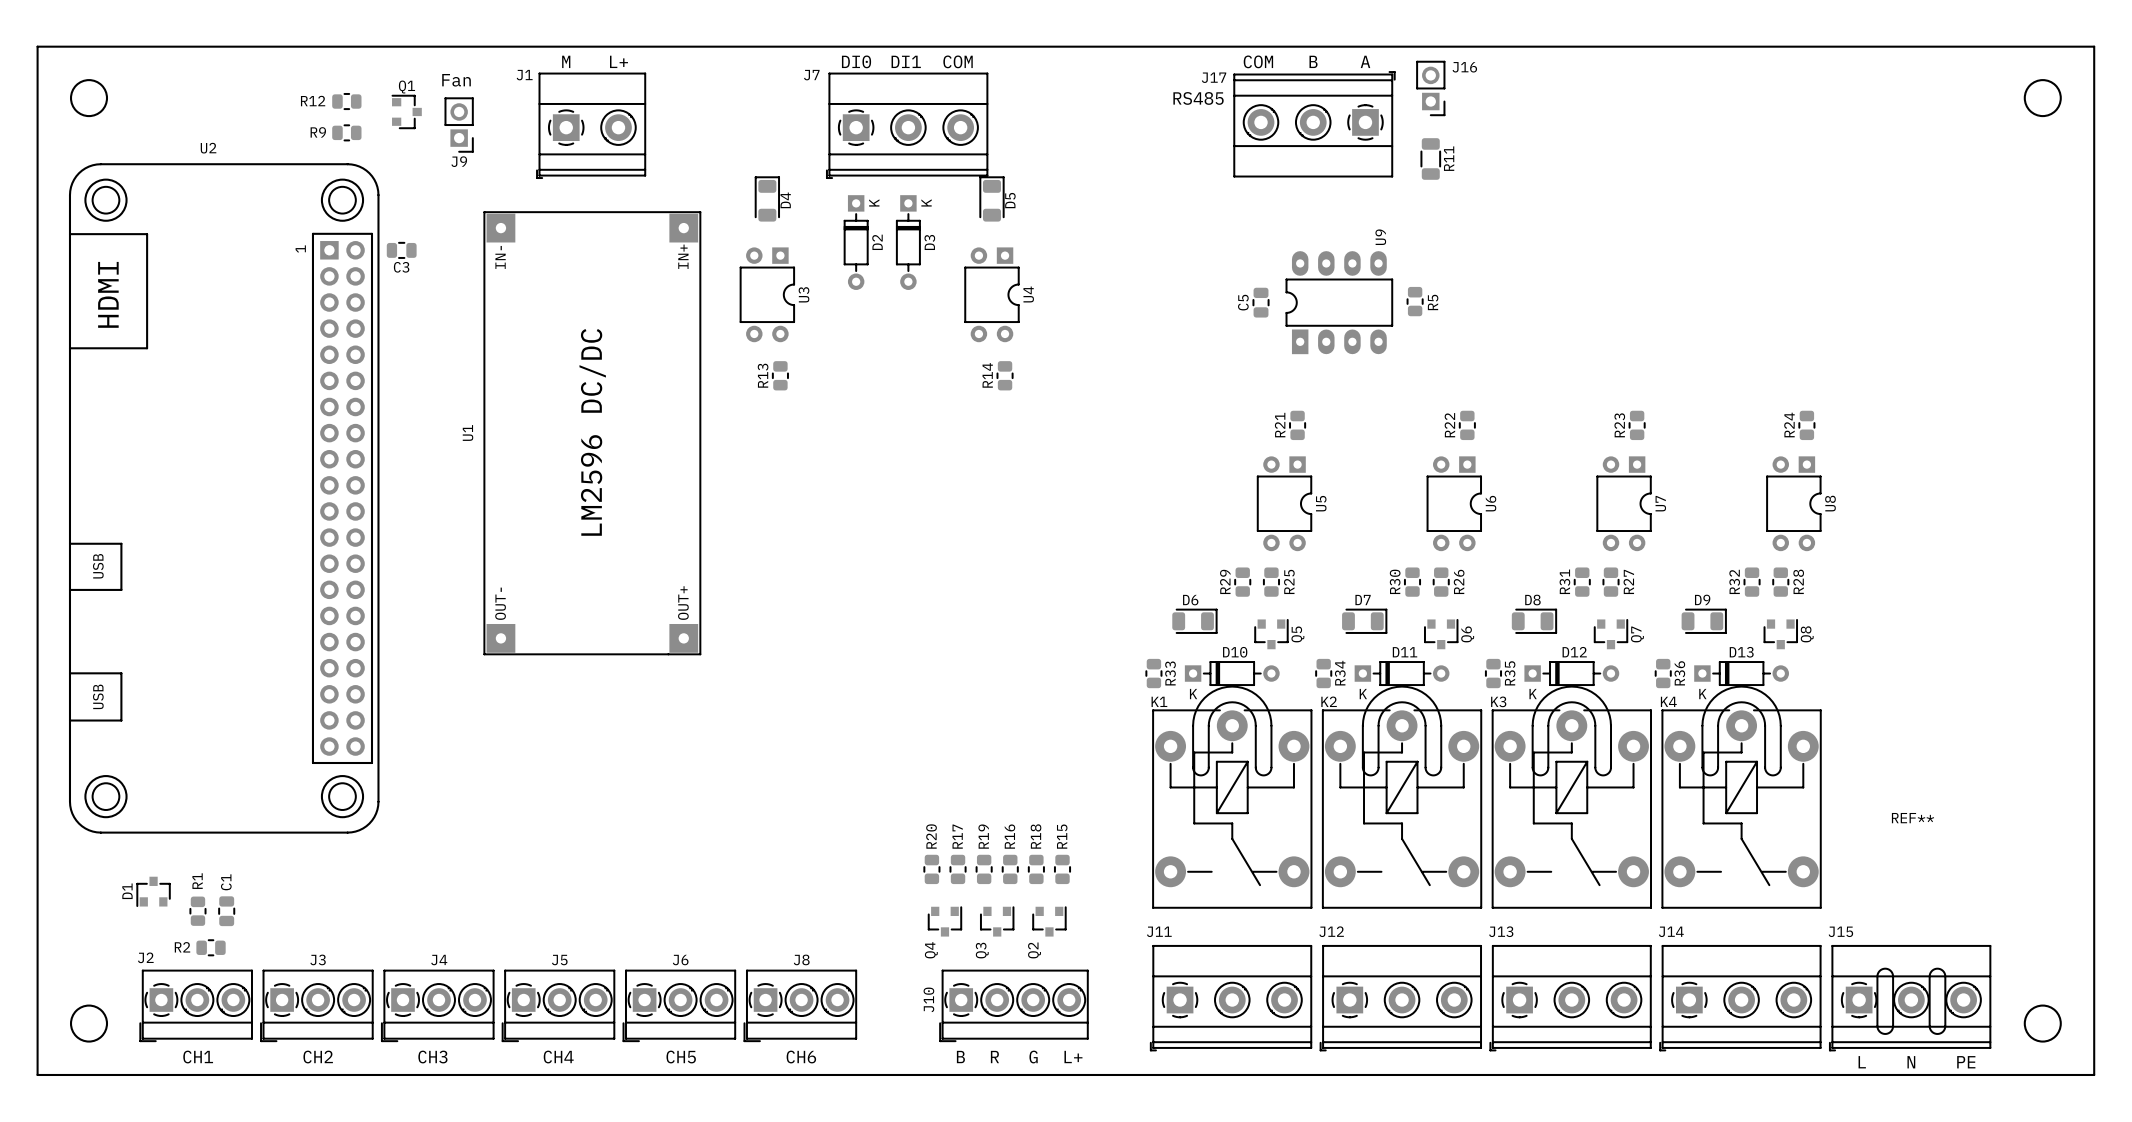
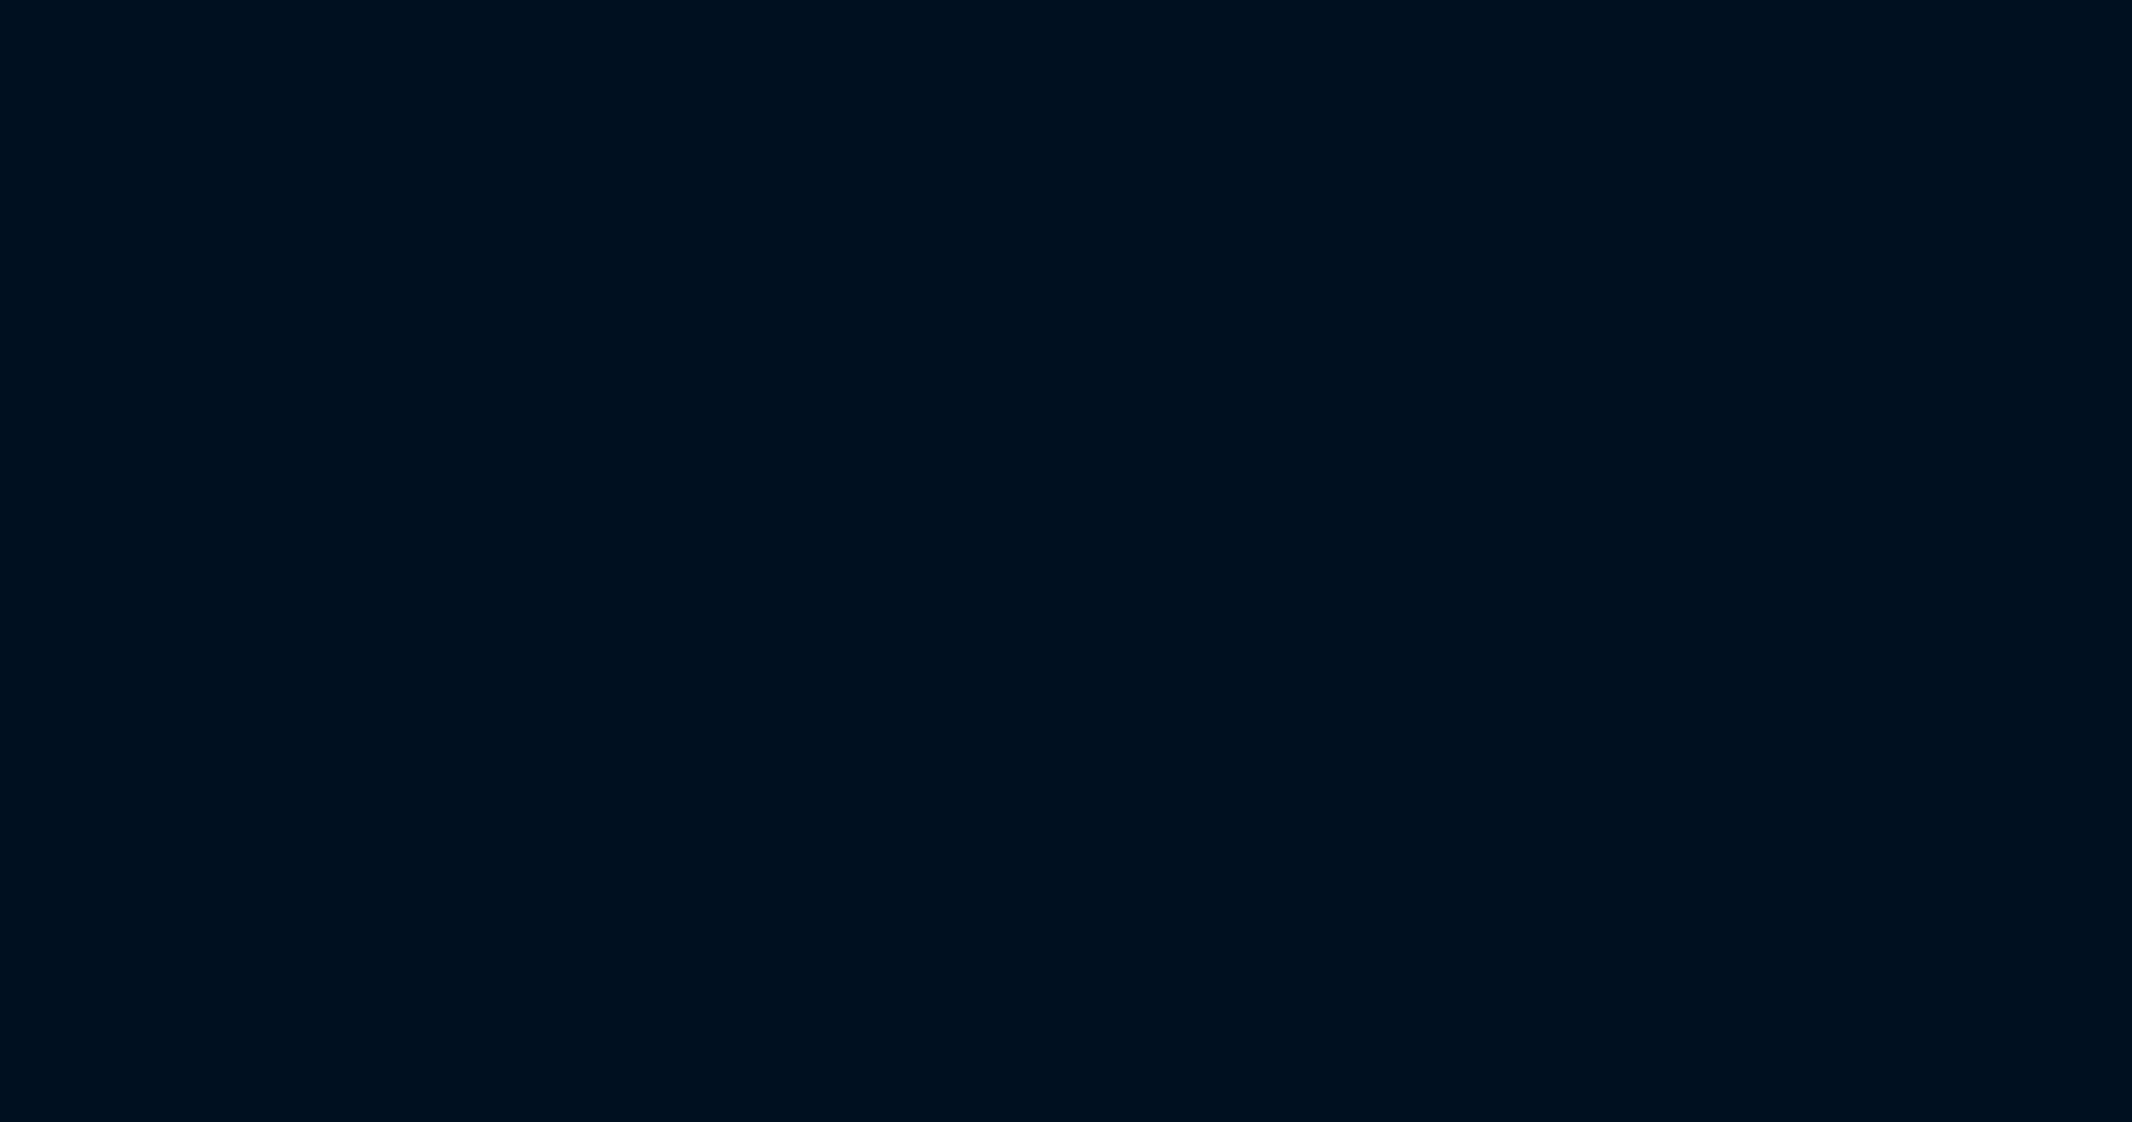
board edge: (37, 46) (37, 1074) (2094, 1074) (2094, 46) (37, 46) -> none
text: M (566, 61) -> none
text: L+ (618, 61) -> none
text: DI0 (856, 61) -> none
text: DI1 (906, 61) -> none
text: COM (958, 61) -> none
text: COM (1258, 61) -> none
text: B (1313, 61) -> none
text: A (1365, 61) -> none
round board edge: [69, 79, 109, 118] -> none
round board edge: [2023, 79, 2062, 118] -> none
text: Fan (456, 80) -> none
J16: (1430, 88) -> none
text: RS485 (1198, 98) -> none
R12: (346, 101) -> none
Q1: (406, 111) -> none
J17: (1314, 124) -> none
J9: (459, 125) -> none
J1: (591, 125) -> none
J7: (907, 125) -> none
R9: (346, 132) -> none
R11: (1430, 158) -> none
round board edge: [91, 186, 120, 215] -> none
round board edge: [328, 186, 357, 215] -> none
D4: (767, 199) -> none
D5: (991, 199) -> none
D2: (856, 242) -> none
D3: (908, 242) -> none
C3: (401, 250) -> none
U3: (767, 294) -> none
U4: (991, 294) -> none
R5: (1415, 301) -> none
C5: (1261, 302) -> none
U9: (1339, 302) -> none
R13: (780, 375) -> none
R14: (1005, 375) -> none
R21: (1297, 425) -> none
R22: (1467, 425) -> none
R23: (1637, 425) -> none
R24: (1806, 425) -> none
U1: (592, 433) -> none
U2: (224, 498) -> none
U5: (1284, 503) -> none
U6: (1454, 503) -> none
U7: (1624, 503) -> none
U8: (1793, 503) -> none
R29: (1242, 582) -> none
R25: (1271, 582) -> none
R30: (1412, 582) -> none
R26: (1441, 582) -> none
R31: (1582, 582) -> none
R27: (1611, 582) -> none
R32: (1752, 582) -> none
R28: (1780, 582) -> none
D6: (1194, 621) -> none
D7: (1364, 621) -> none
D8: (1534, 621) -> none
D9: (1704, 621) -> none
Q5: (1271, 634) -> none
Q6: (1441, 634) -> none
Q7: (1611, 634) -> none
Q8: (1780, 634) -> none
R33: (1153, 673) -> none
D10: (1232, 673) -> none
R34: (1323, 673) -> none
D11: (1402, 673) -> none
R35: (1493, 673) -> none
D12: (1571, 673) -> none
R36: (1663, 673) -> none
D13: (1741, 673) -> none
board edge: (1193, 725) (1193, 768) (1196, 773) (1201, 775) (1206, 773) (1208, 768) (1208, 725) (1211, 714) (1217, 707) (1226, 703) (1235, 702) (1244, 705) (1252, 714) (1255, 722) (1256, 770) (1263, 775) (1270, 771) (1270, 715) (1263, 701) (1251, 691) (1232, 686) (1212, 691) (1198, 706) (1193, 725) -> none
board edge: (1362, 725) (1362, 768) (1365, 773) (1371, 775) (1376, 773) (1378, 768) (1378, 725) (1381, 714) (1387, 707) (1395, 703) (1405, 702) (1413, 705) (1422, 714) (1425, 722) (1426, 770) (1433, 775) (1440, 771) (1439, 715) (1433, 701) (1421, 691) (1402, 686) (1382, 691) (1368, 706) (1362, 725) -> none
board edge: (1532, 725) (1532, 768) (1535, 773) (1541, 775) (1546, 773) (1548, 768) (1548, 725) (1551, 714) (1557, 707) (1565, 703) (1574, 702) (1583, 705) (1592, 714) (1595, 722) (1595, 770) (1603, 775) (1609, 771) (1609, 715) (1602, 701) (1591, 691) (1571, 686) (1552, 691) (1537, 706) (1532, 725) -> none
board edge: (1702, 725) (1702, 768) (1705, 773) (1711, 775) (1715, 773) (1718, 768) (1718, 725) (1721, 714) (1727, 707) (1735, 703) (1744, 702) (1753, 705) (1761, 714) (1764, 722) (1765, 770) (1772, 775) (1779, 771) (1779, 715) (1772, 701) (1761, 691) (1741, 686) (1722, 691) (1707, 706) (1702, 725) -> none
round board edge: [91, 782, 120, 811] -> none
round board edge: [328, 782, 357, 811] -> none
K1: (1232, 809) -> none
K2: (1402, 809) -> none
K3: (1571, 809) -> none
K4: (1741, 809) -> none
REF**: (1913, 818) -> none
R20: (931, 869) -> none
R17: (958, 869) -> none
R19: (984, 869) -> none
R16: (1010, 869) -> none
R18: (1036, 869) -> none
R15: (1062, 869) -> none
D1: (153, 891) -> none
R1: (197, 911) -> none
C1: (226, 911) -> none
Q4: (944, 921) -> none
Q3: (997, 921) -> none
Q2: (1049, 921) -> none
R2: (211, 947) -> none
board edge: (1877, 976) (1877, 1027) (1880, 1032) (1886, 1033) (1890, 1031) (1893, 1027) (1893, 975) (1890, 970) (1885, 968) (1879, 970) (1877, 976) -> none
board edge: (1929, 976) (1929, 1027) (1932, 1032) (1938, 1033) (1943, 1031) (1945, 1027) (1945, 975) (1943, 970) (1937, 968) (1931, 970) (1929, 976) -> none
J11: (1231, 998) -> none
J12: (1400, 998) -> none
J13: (1570, 998) -> none
J14: (1740, 998) -> none
J15: (1910, 998) -> none
round board edge: [69, 1004, 109, 1043] -> none
round board edge: [2023, 1004, 2062, 1043] -> none
J2: (196, 1005) -> none
J3: (316, 1005) -> none
J4: (437, 1005) -> none
J5: (558, 1005) -> none
J6: (679, 1005) -> none
J8: (800, 1005) -> none
J10: (1013, 1005) -> none
text: CH1 (198, 1057) -> none
text: CH2 (318, 1057) -> none
text: CH3 (432, 1057) -> none
text: CH4 (558, 1057) -> none
text: CH5 (681, 1057) -> none
text: CH6 (801, 1057) -> none
text: B (960, 1057) -> none
text: R (994, 1057) -> none
text: G (1033, 1057) -> none
text: L+ (1073, 1057) -> none
text: L (1862, 1062) -> none
text: N (1911, 1062) -> none
text: PE (1966, 1062) -> none

